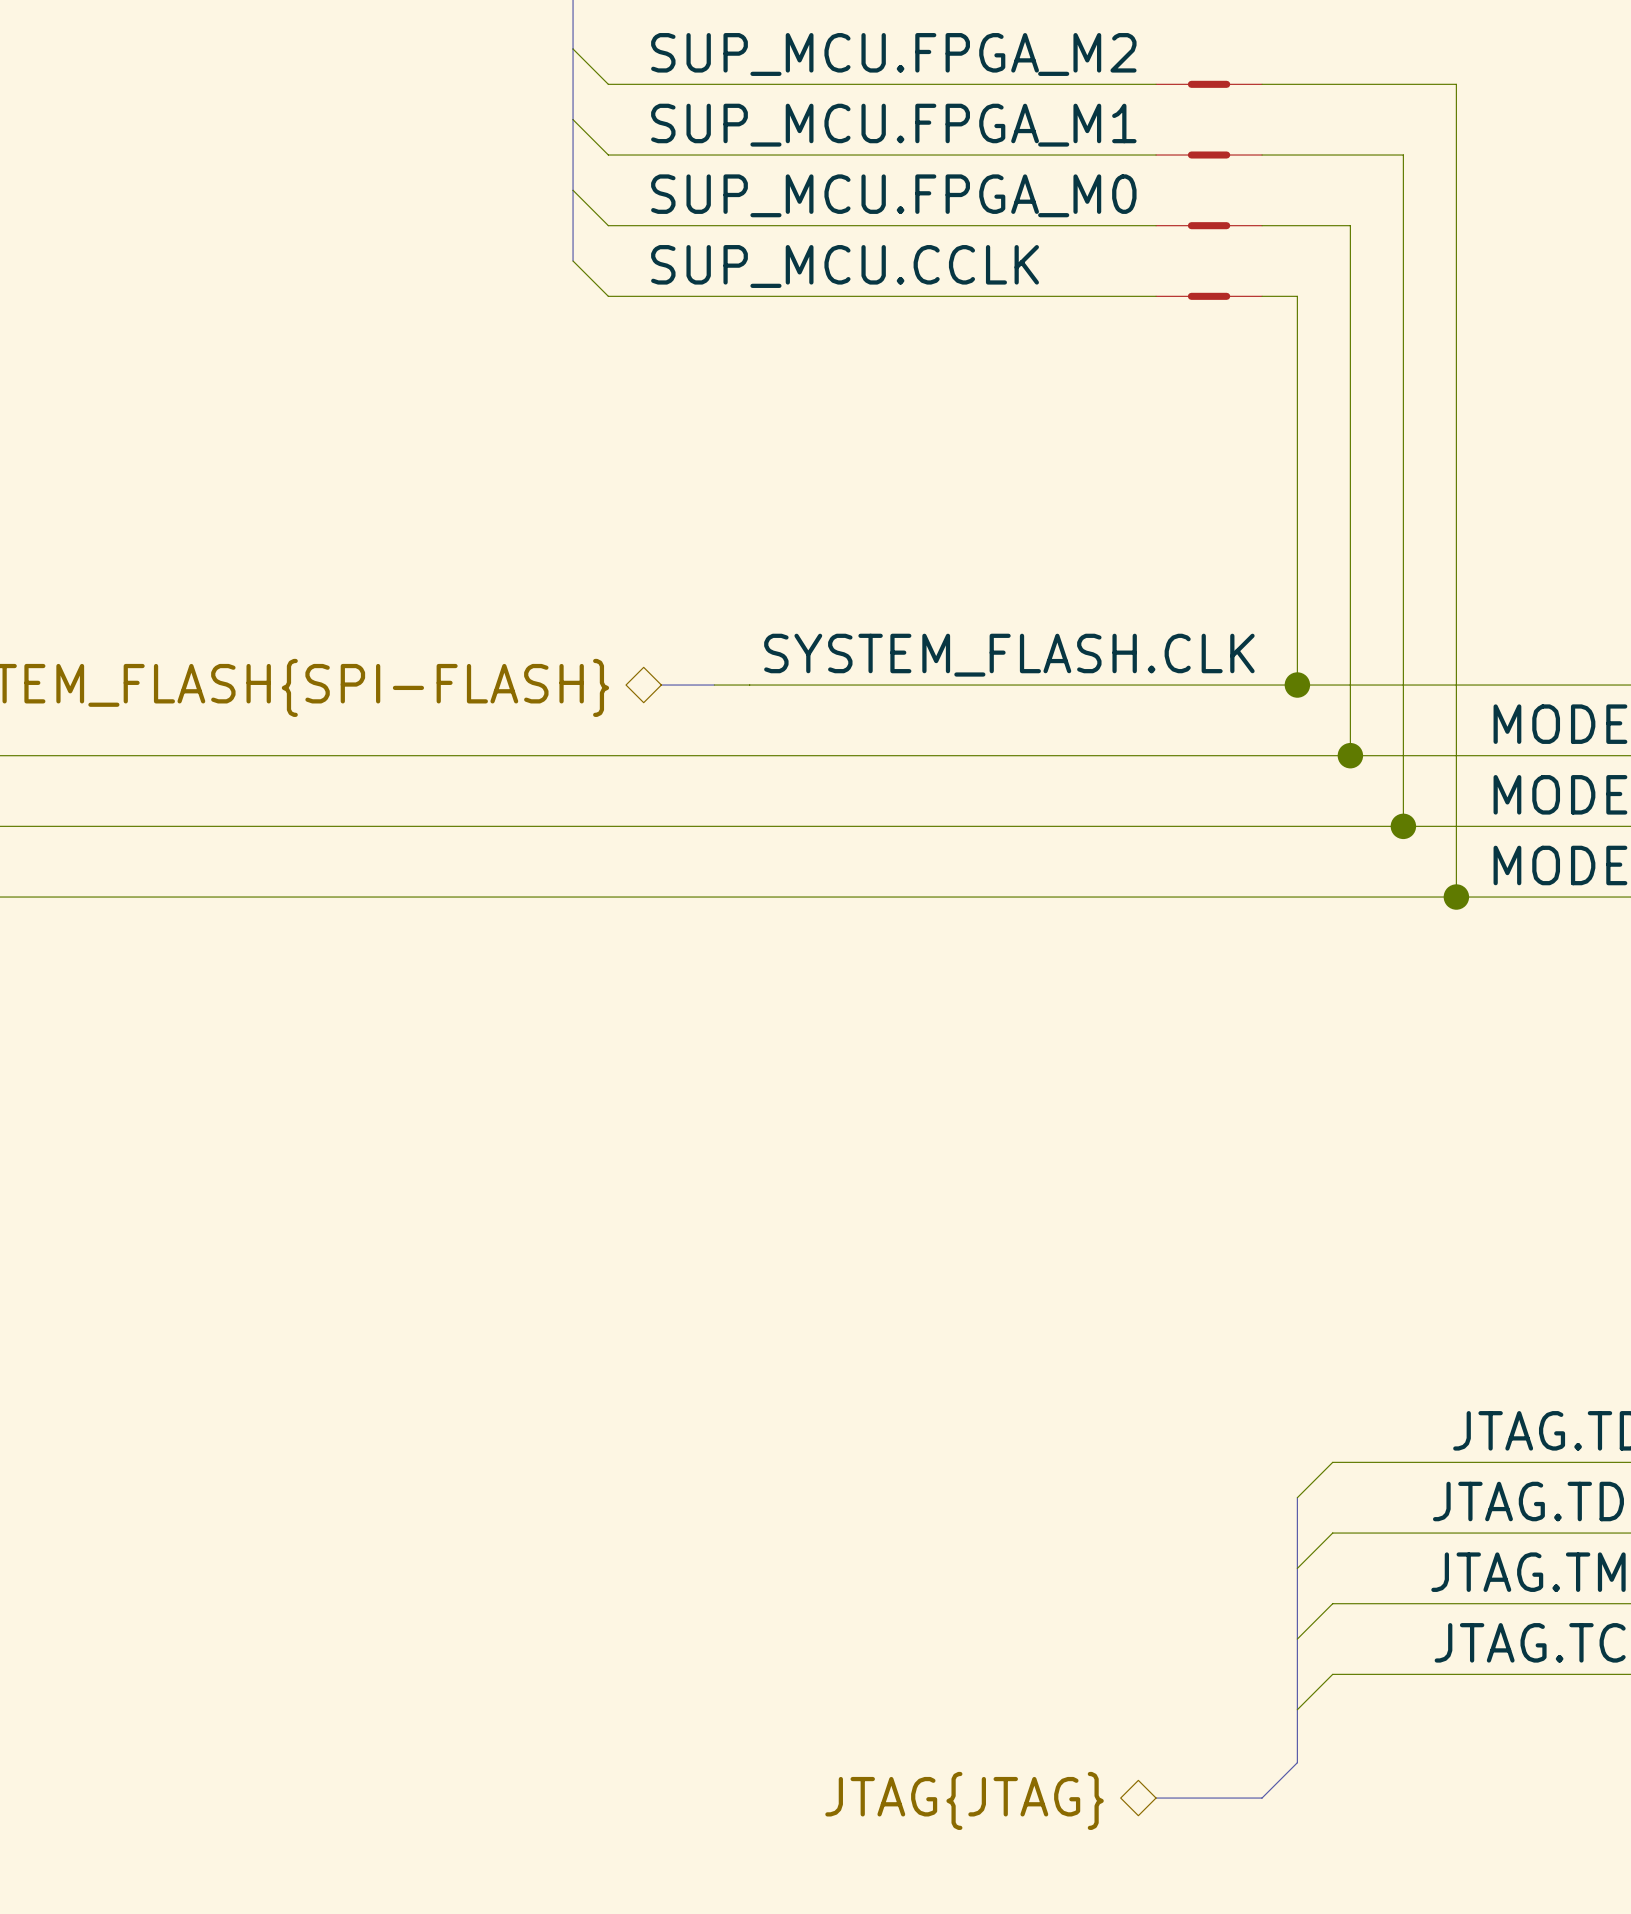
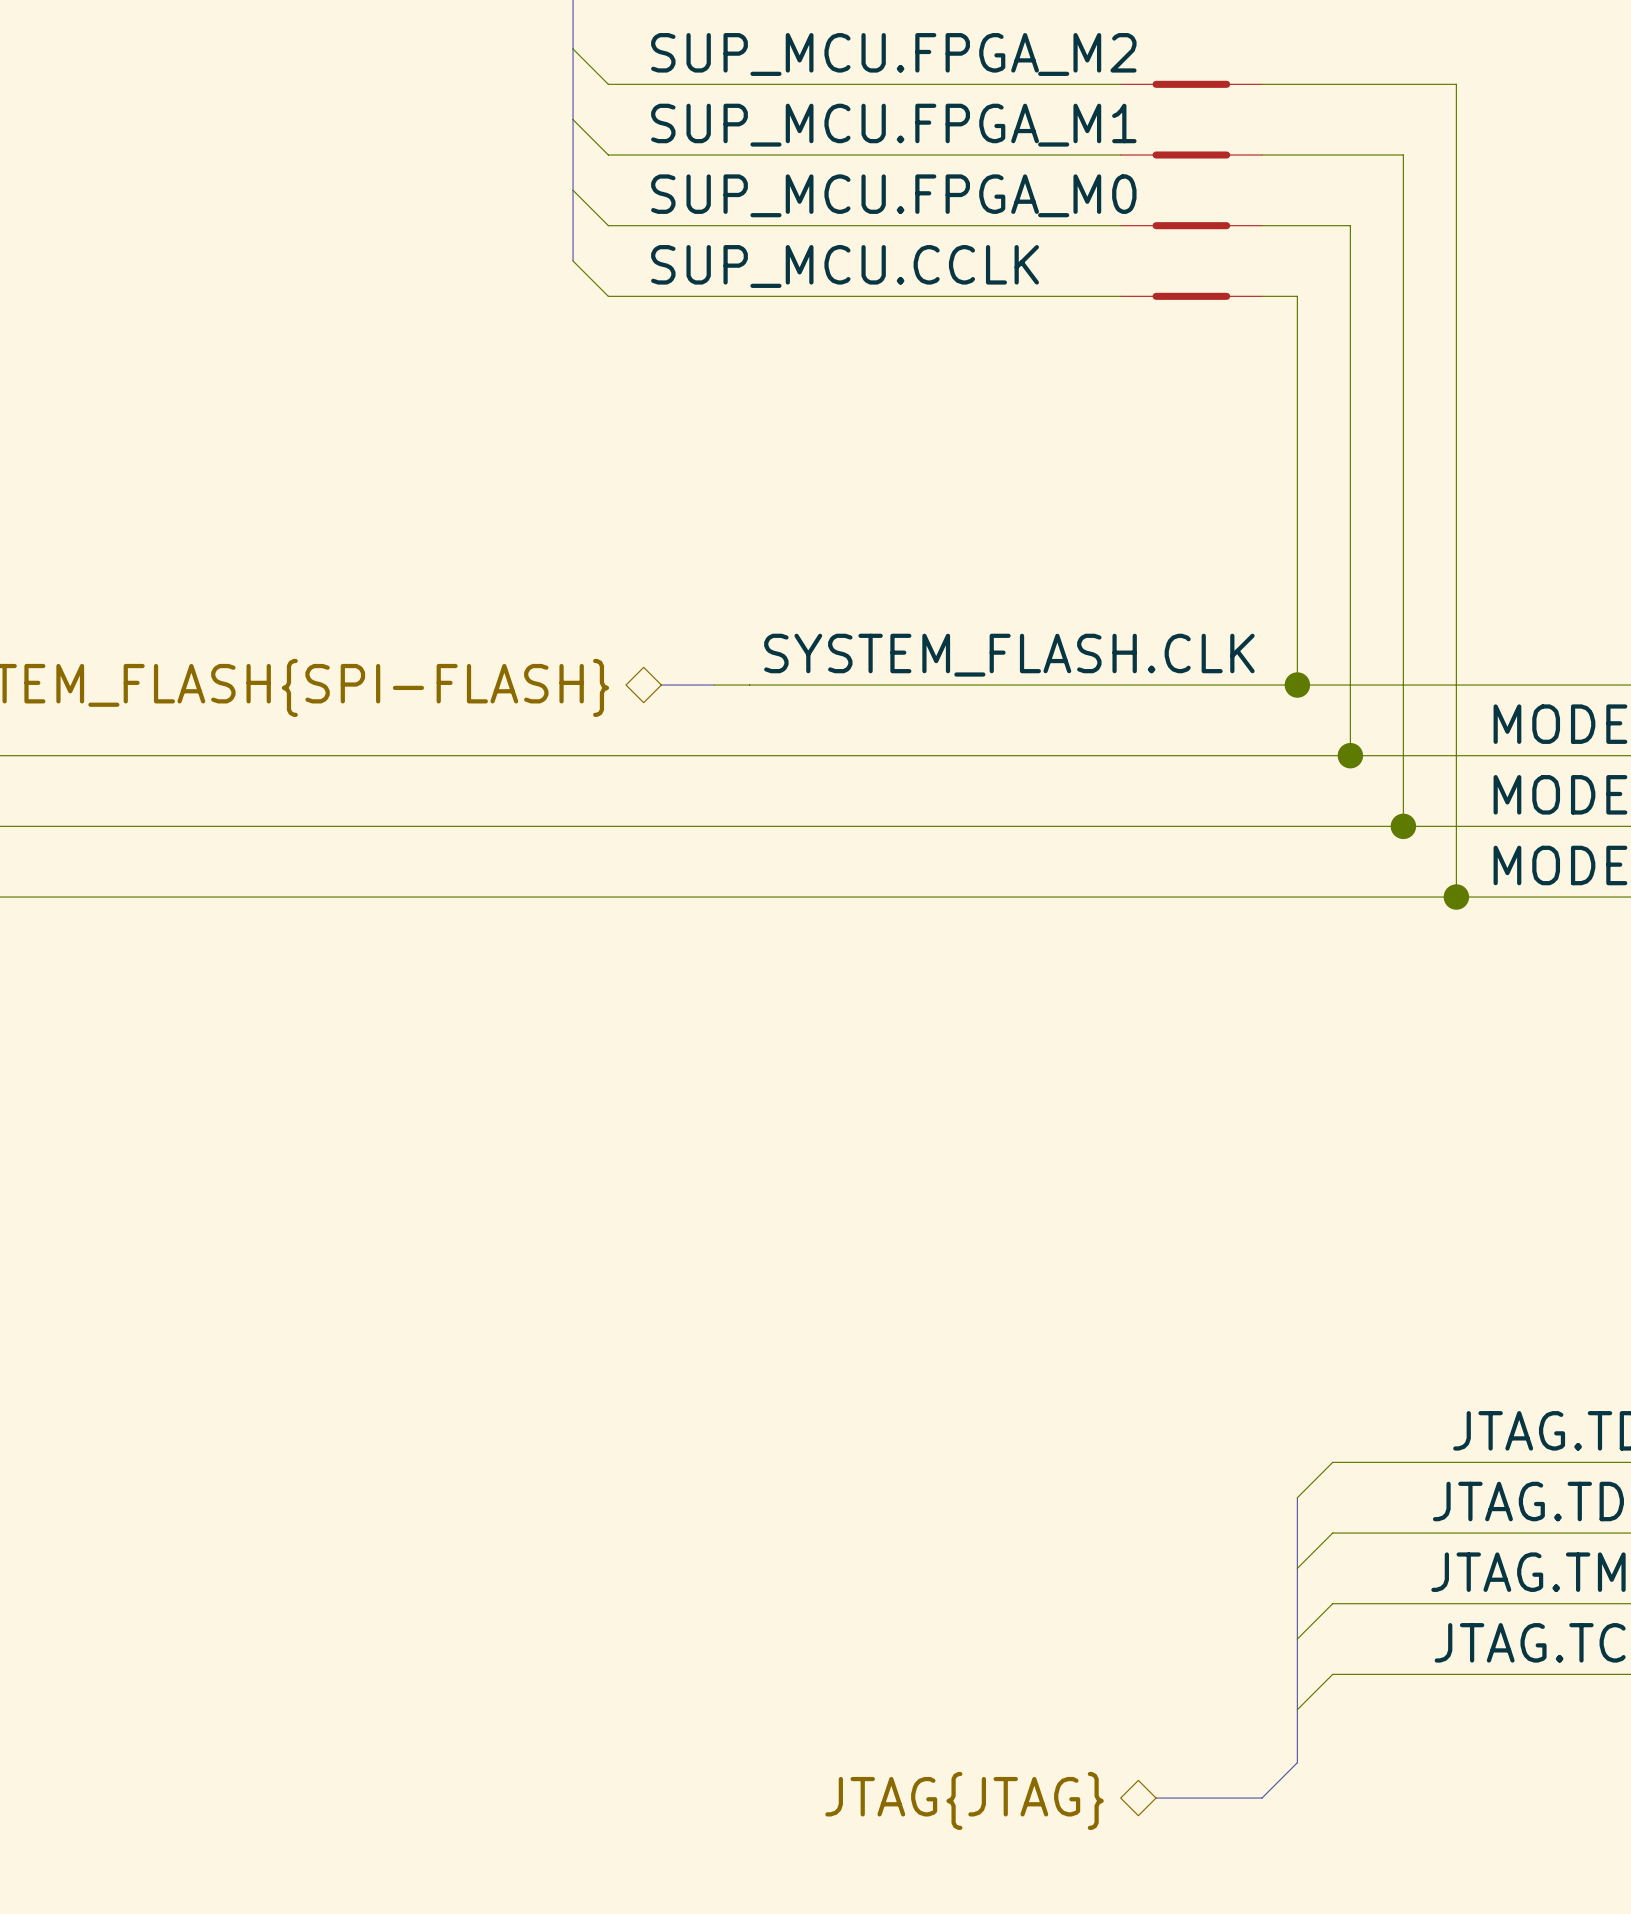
part symbol: [1156, 80, 1263, 88] -> [1120, 80, 1263, 88]
part symbol: [1156, 151, 1263, 159] -> [1120, 151, 1263, 159]
part symbol: [1156, 222, 1263, 230] -> [1120, 222, 1263, 230]
part symbol: [1156, 292, 1263, 300] -> [1120, 292, 1263, 300]

